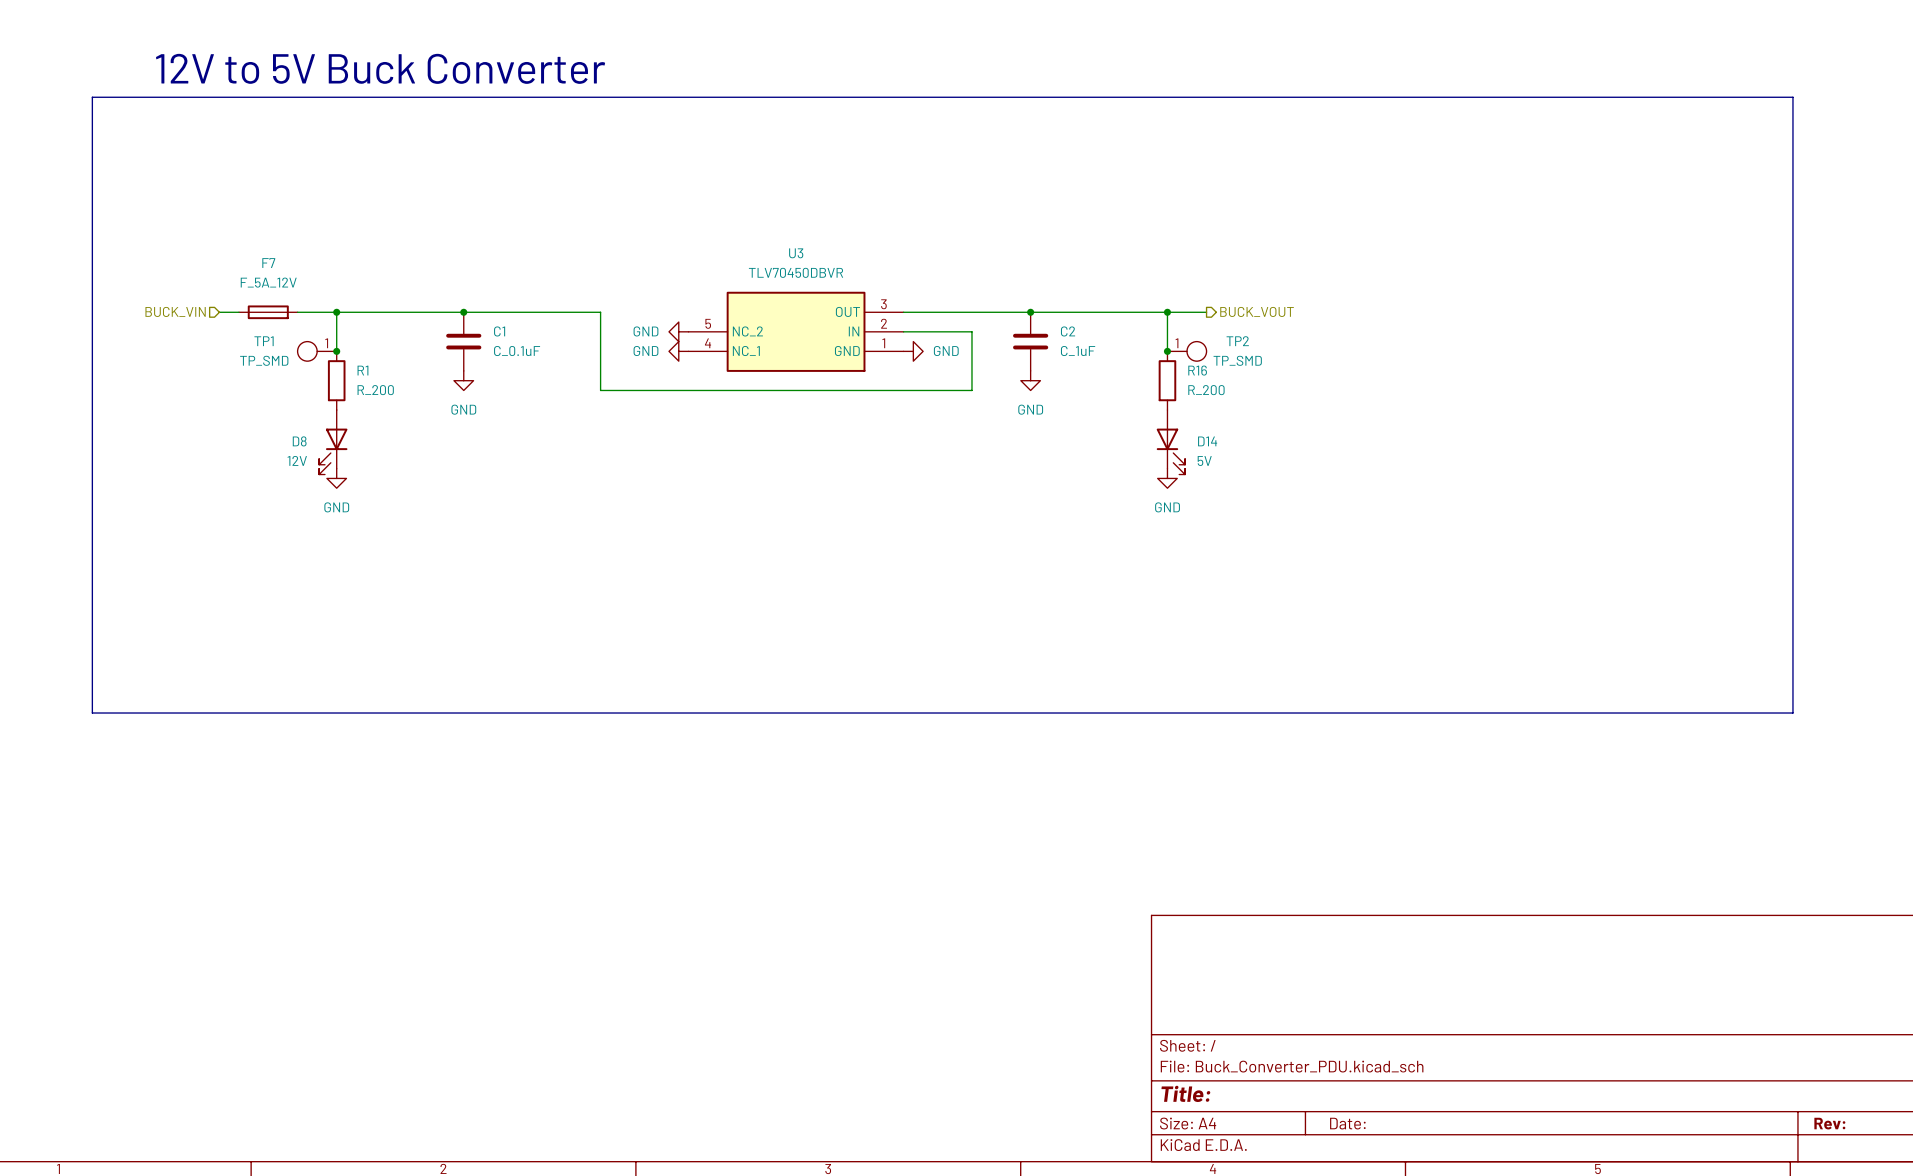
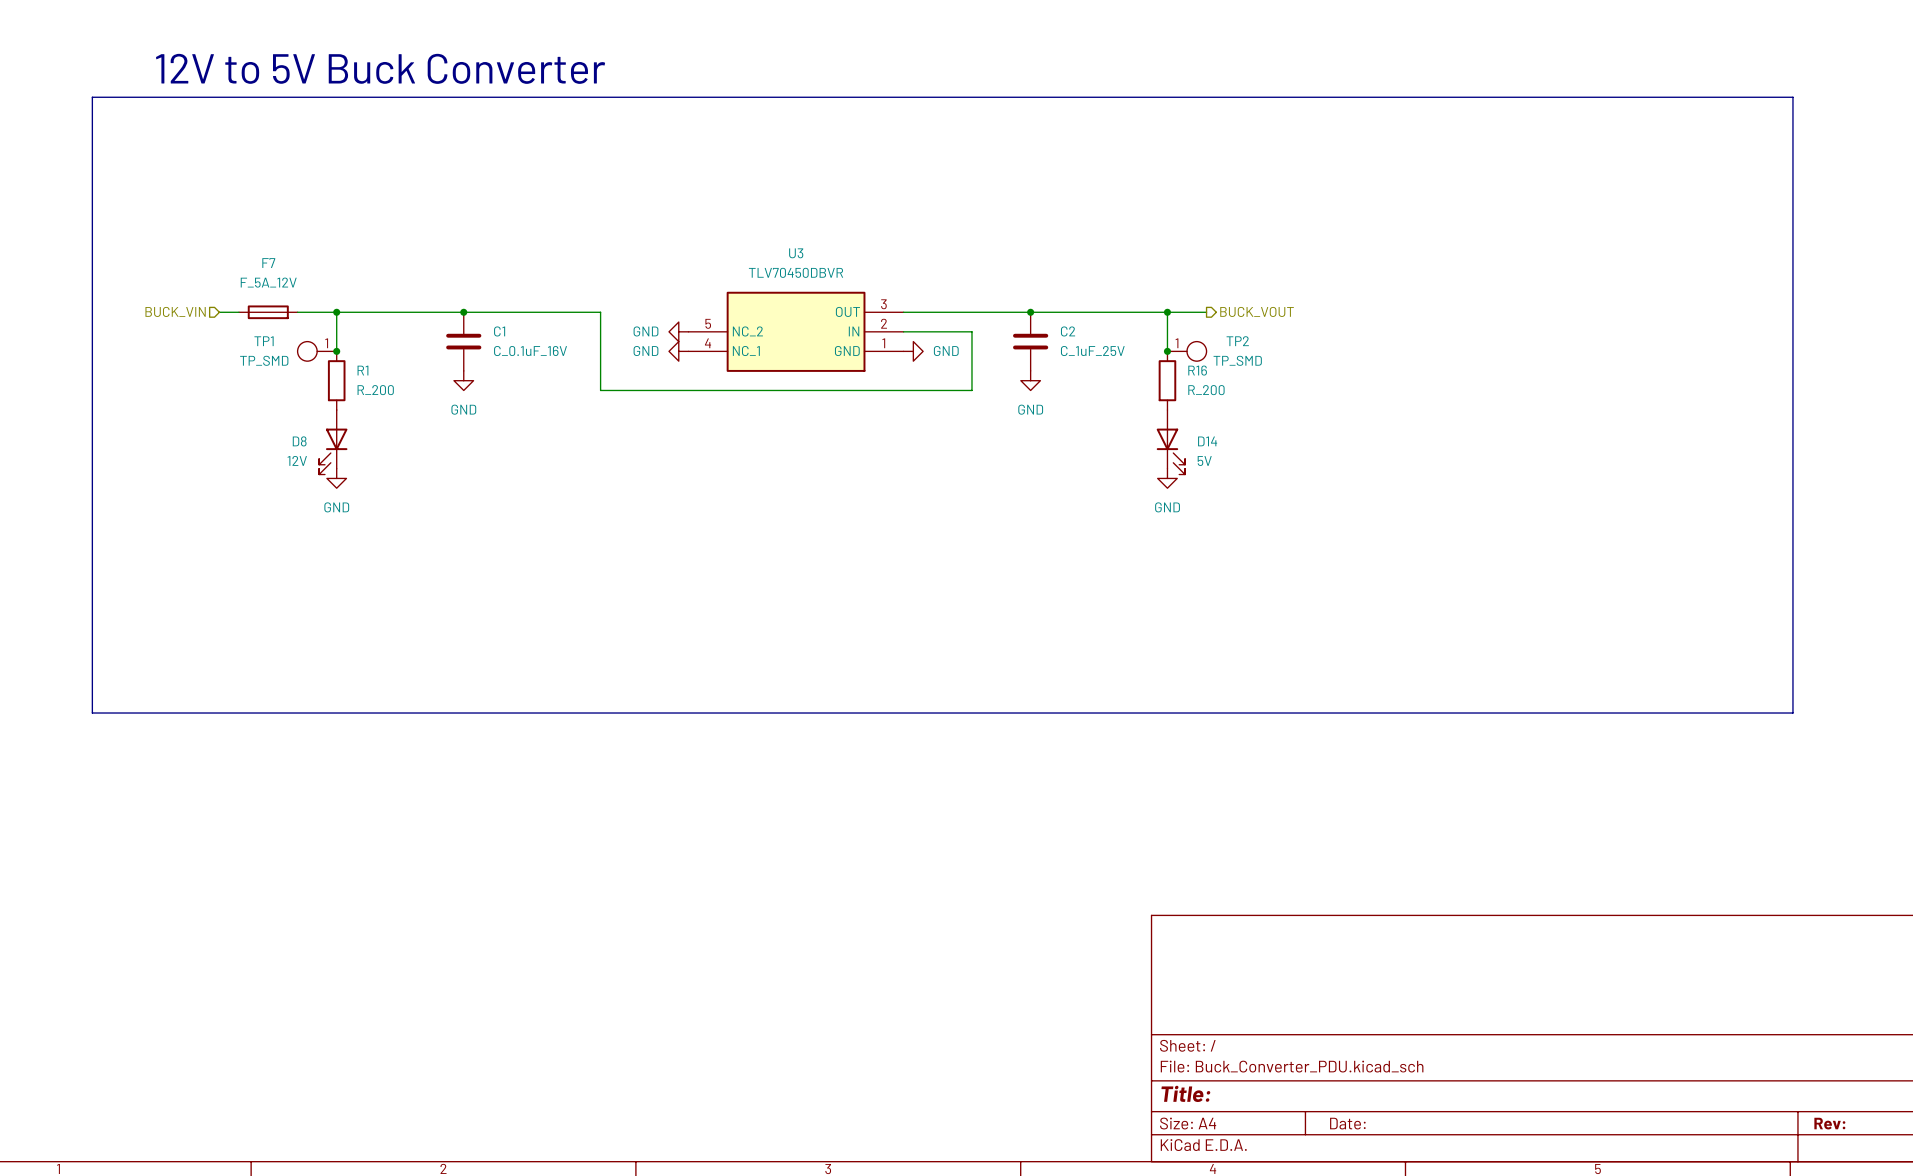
C1 value: C_0.1uF (517, 351) -> C_0.1uF_16V (530, 351)
C2 value: C_1uF (1078, 351) -> C_1uF_25V (1092, 351)

